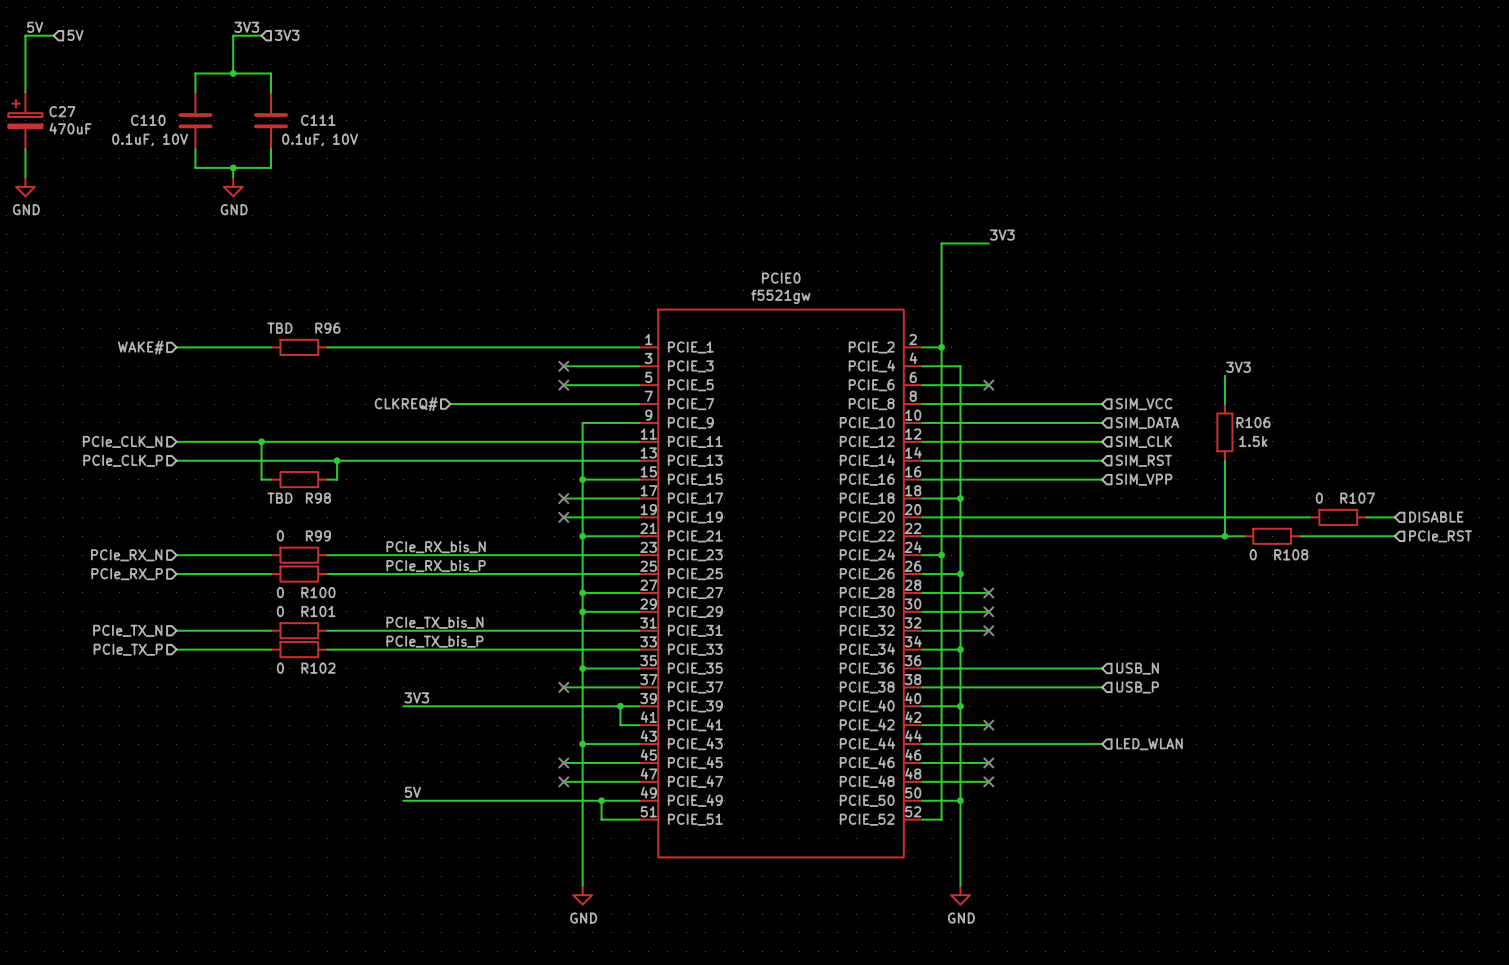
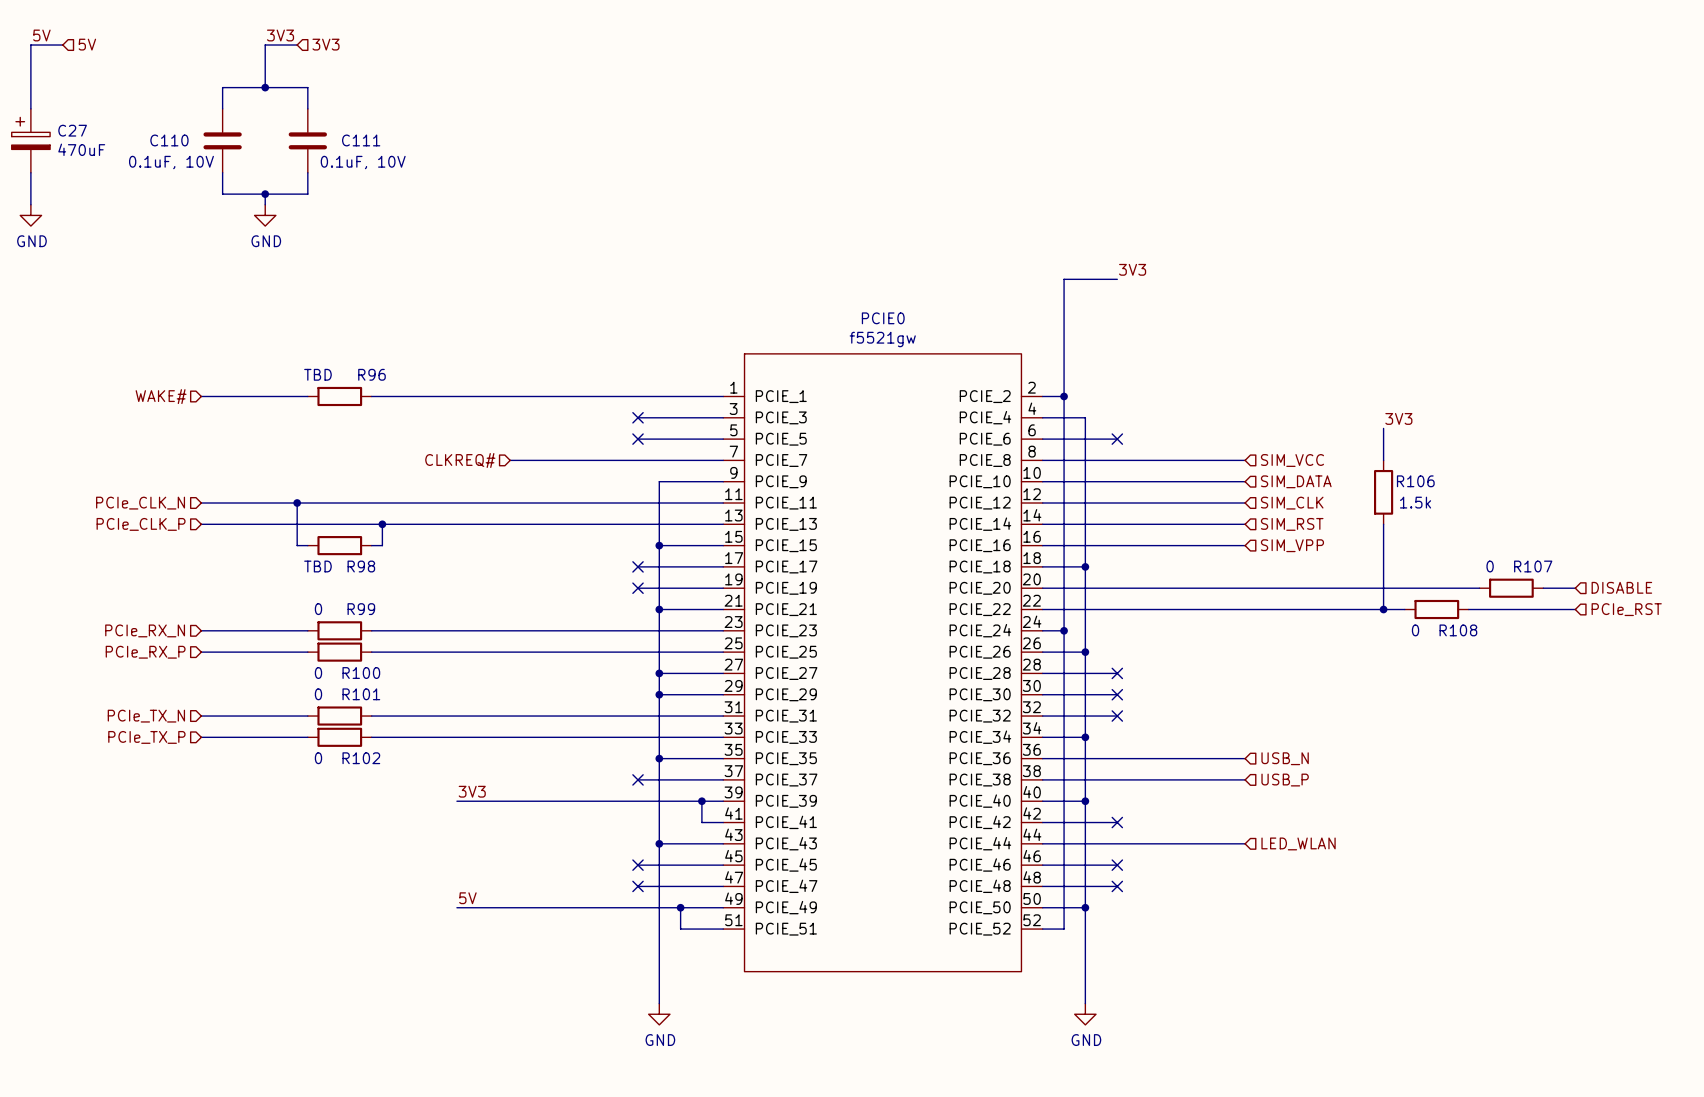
label: PCIe_RX_bis_N (436, 547) -> none
label: PCIe_RX_bis_P (436, 566) -> none
label: PCIe_TX_bis_N (435, 622) -> none
label: PCIe_TX_bis_P (435, 641) -> none

